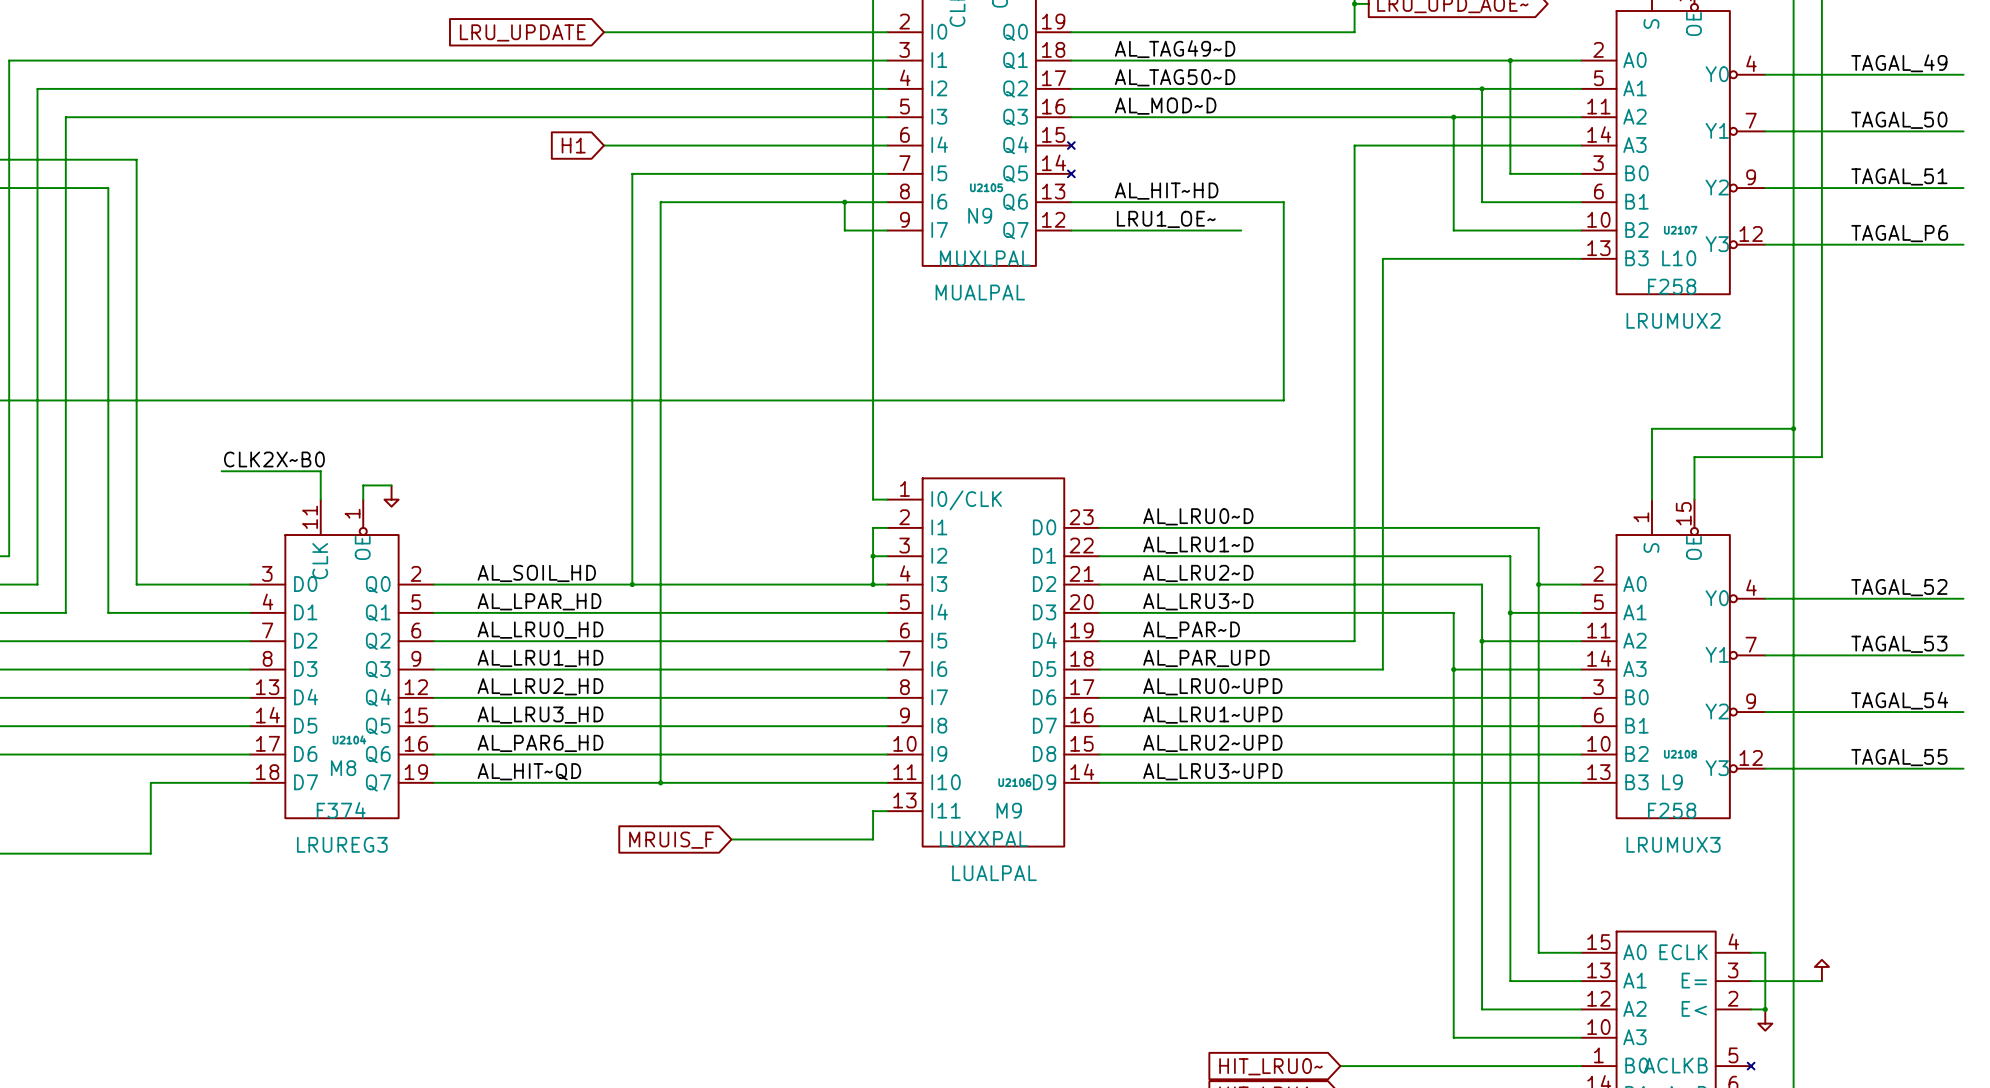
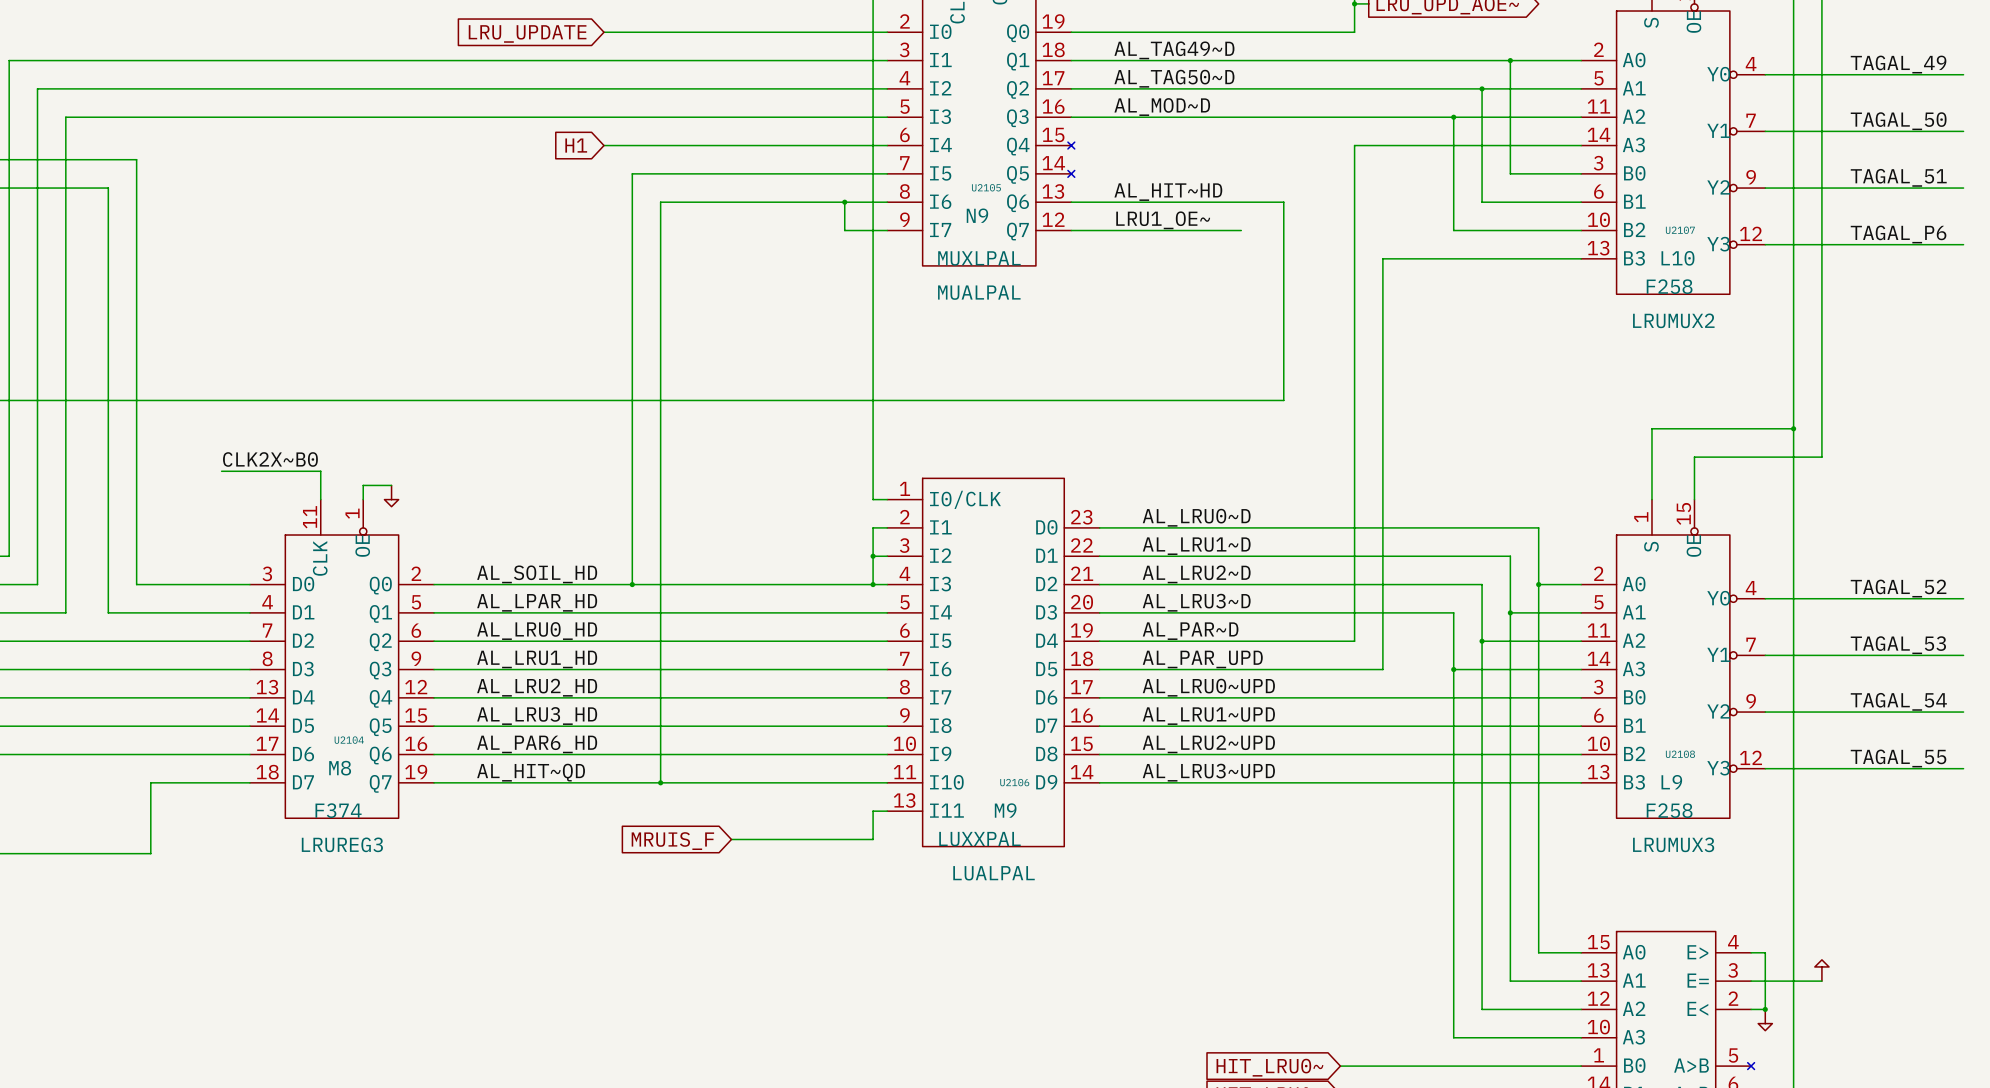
part pin name: ECLK (1683, 952) -> E> (1697, 952)
part pin name: ACLKB (1675, 1065) -> A>B (1691, 1065)

